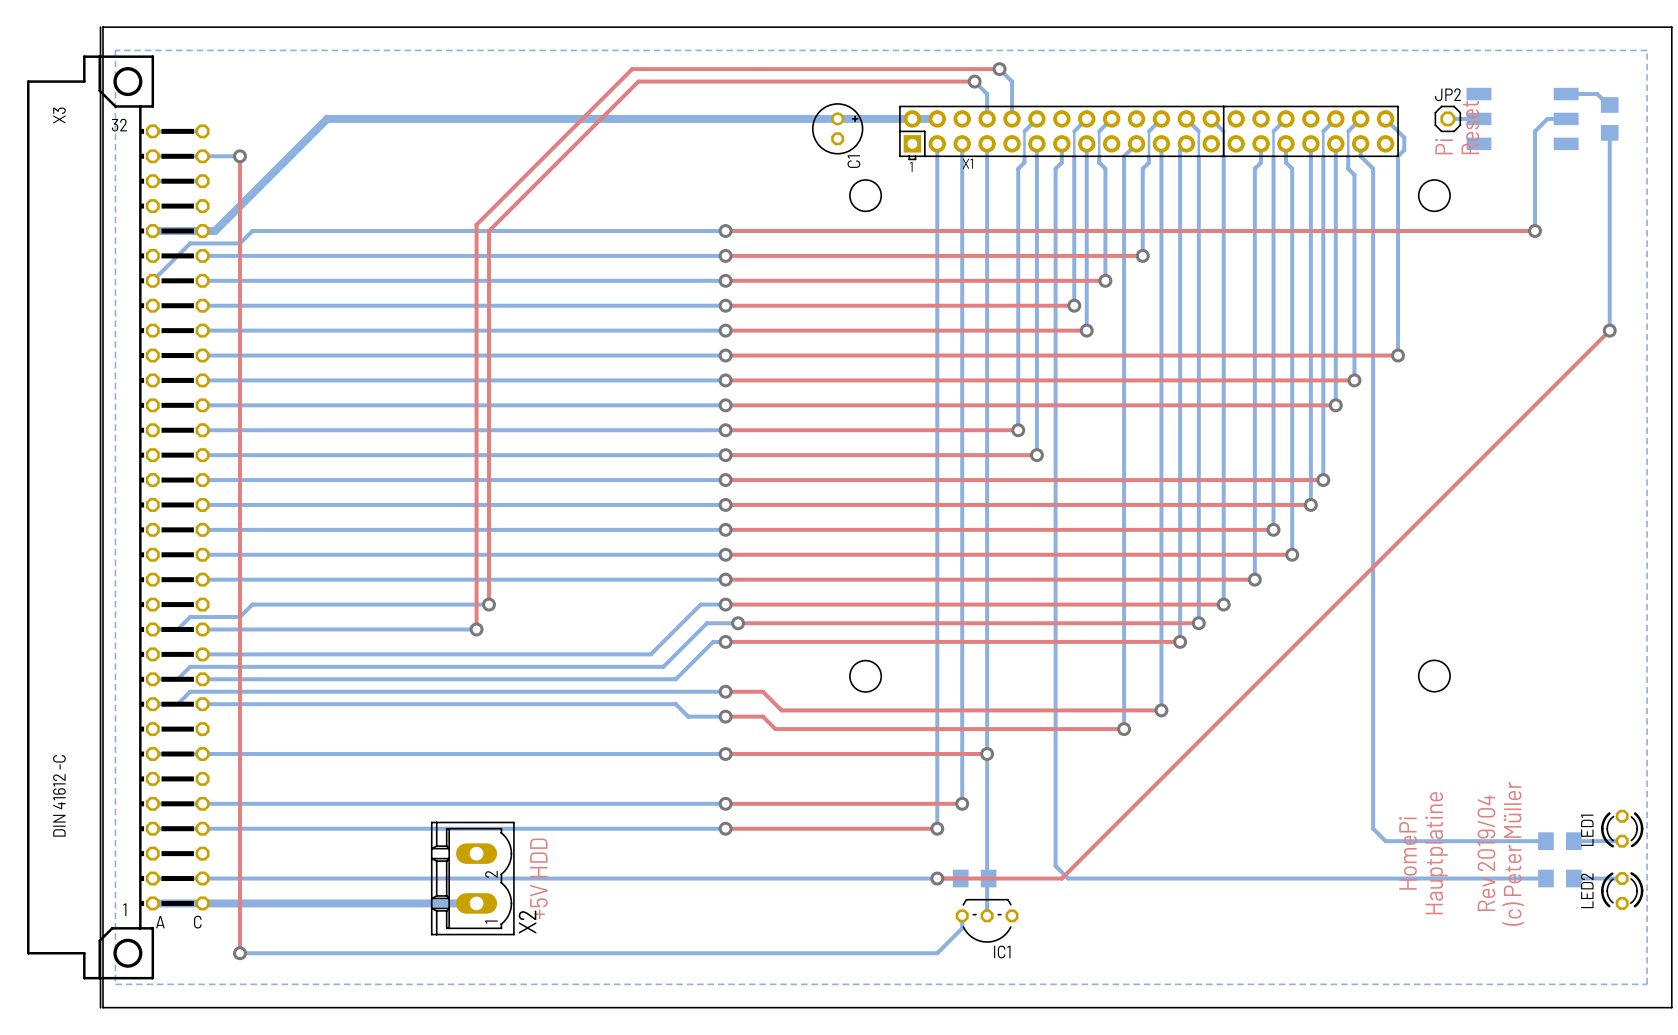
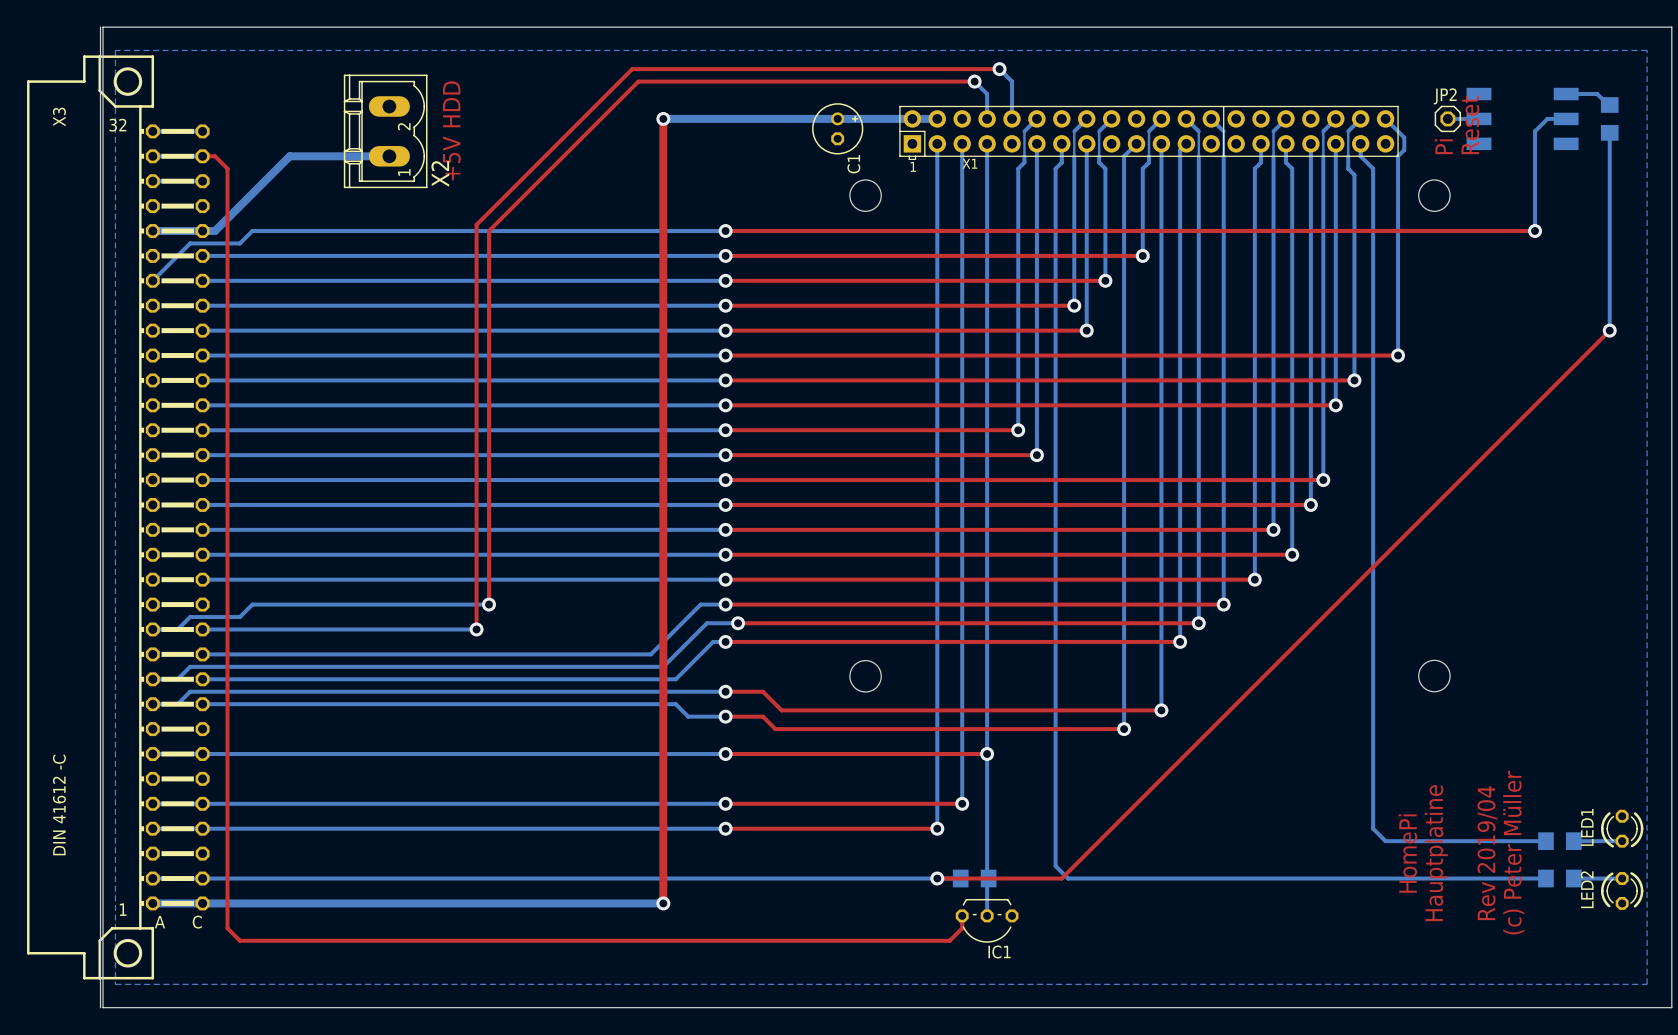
bottom track: (663, 118) (327, 118) (289, 156) -> (389, 156) (289, 156)
top track: none -> (663, 118) (663, 903)
via: none -> (663, 118)
text: none -> +5V HDD (451, 130)
bottom track: (202, 156) (239, 156) -> none
top track: none -> (202, 156) (215, 156) (227, 168) (227, 928) (239, 940) (949, 940) (962, 928) (962, 915)
top track: (239, 156) (239, 953) -> none
via: (239, 156) -> none
X2 position: (472, 878) -> (385, 131)
text: +5V HDD (538, 878) -> none
bottom track: none -> (476, 903) (663, 903)
via: none -> (663, 903)
bottom track: (962, 915) (962, 928) (937, 953) (239, 953) -> none
via: (239, 953) -> none

